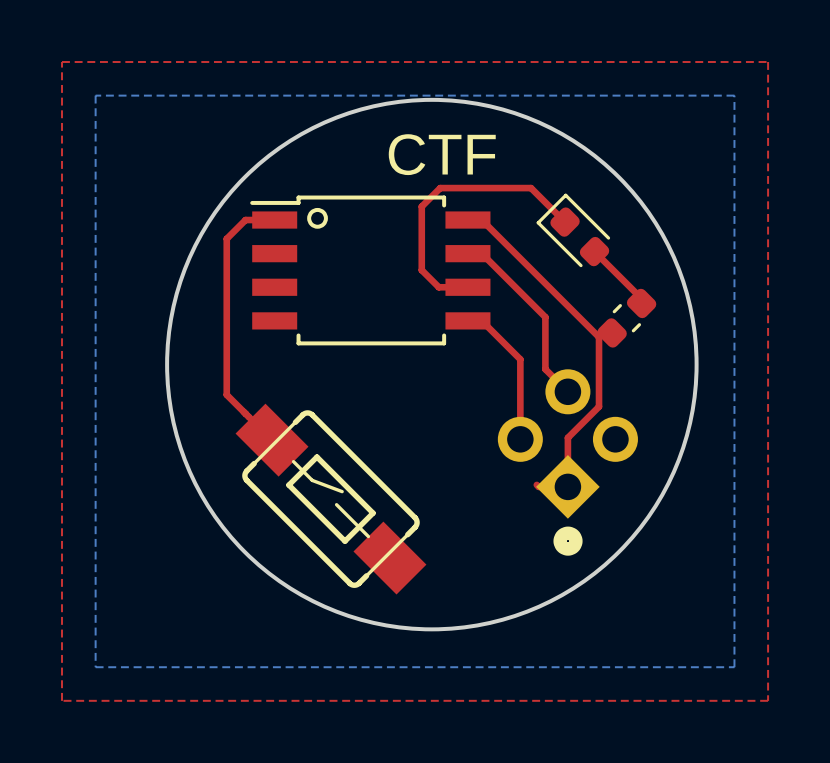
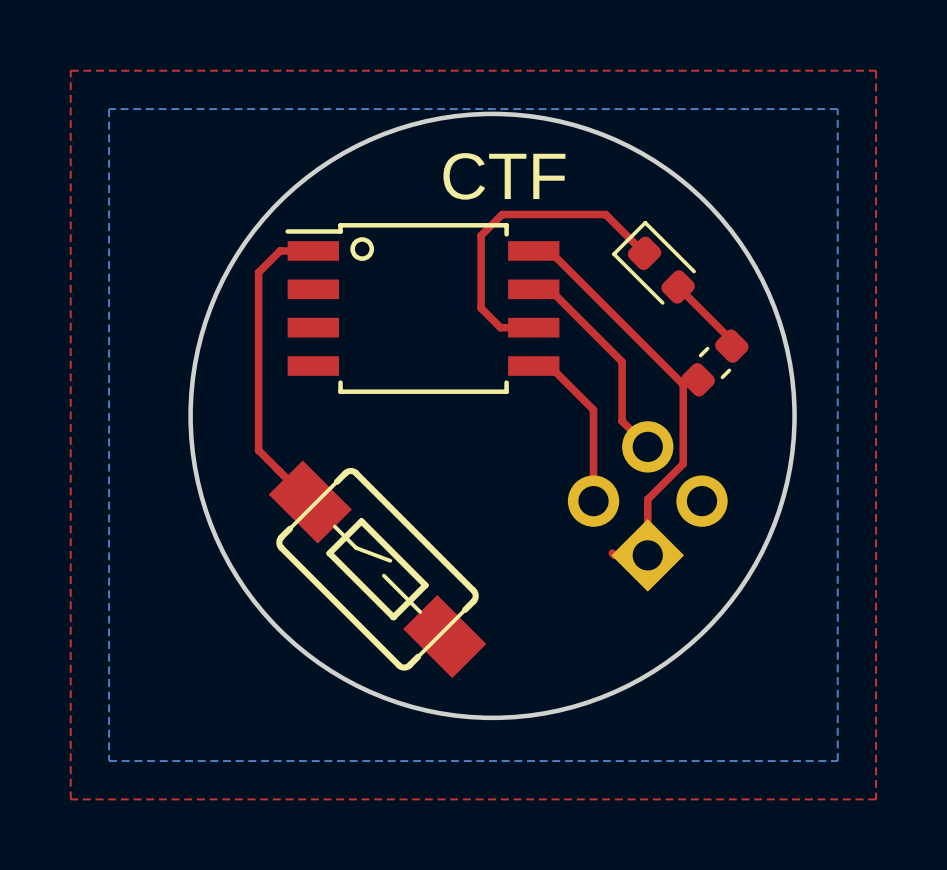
drawing: [553, 526, 583, 556] -> none

